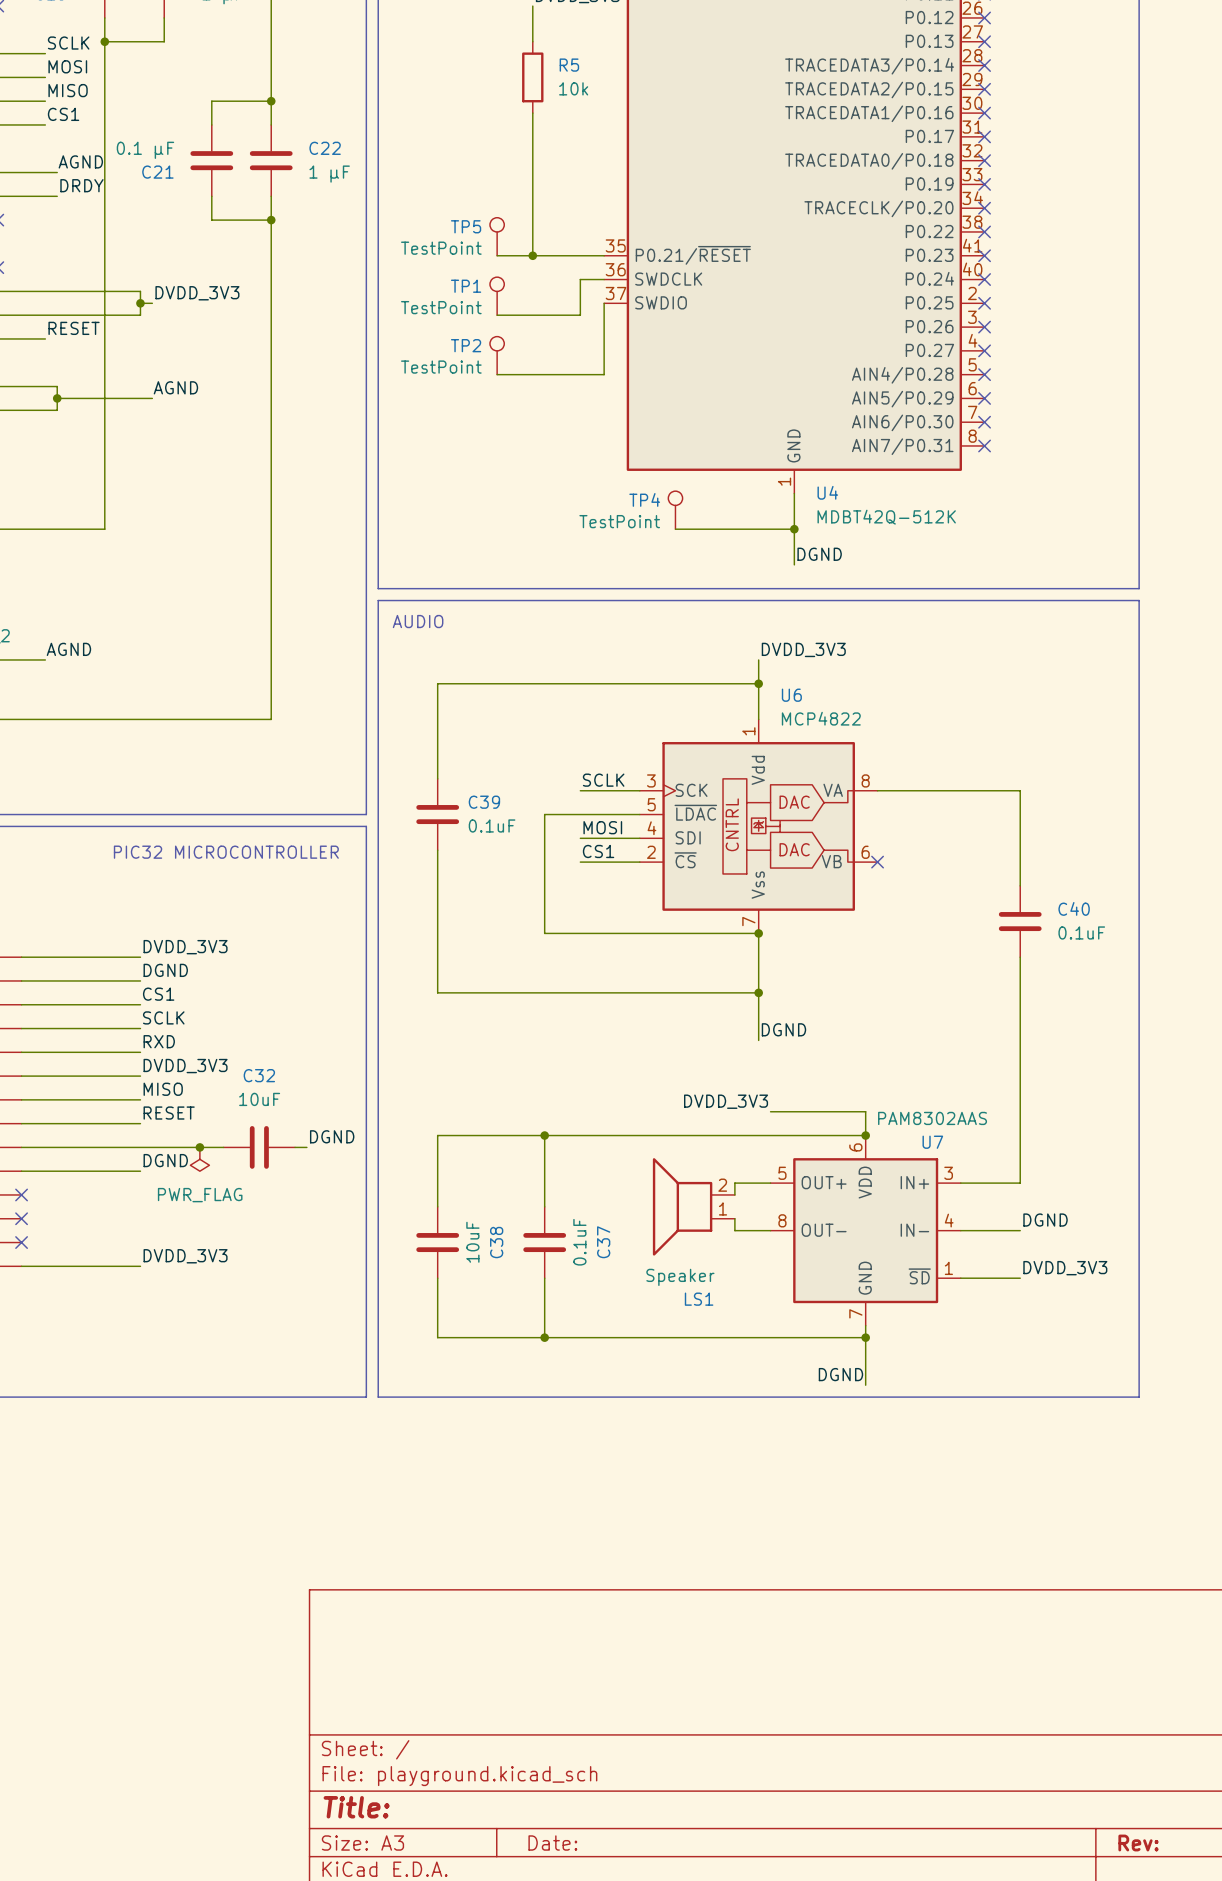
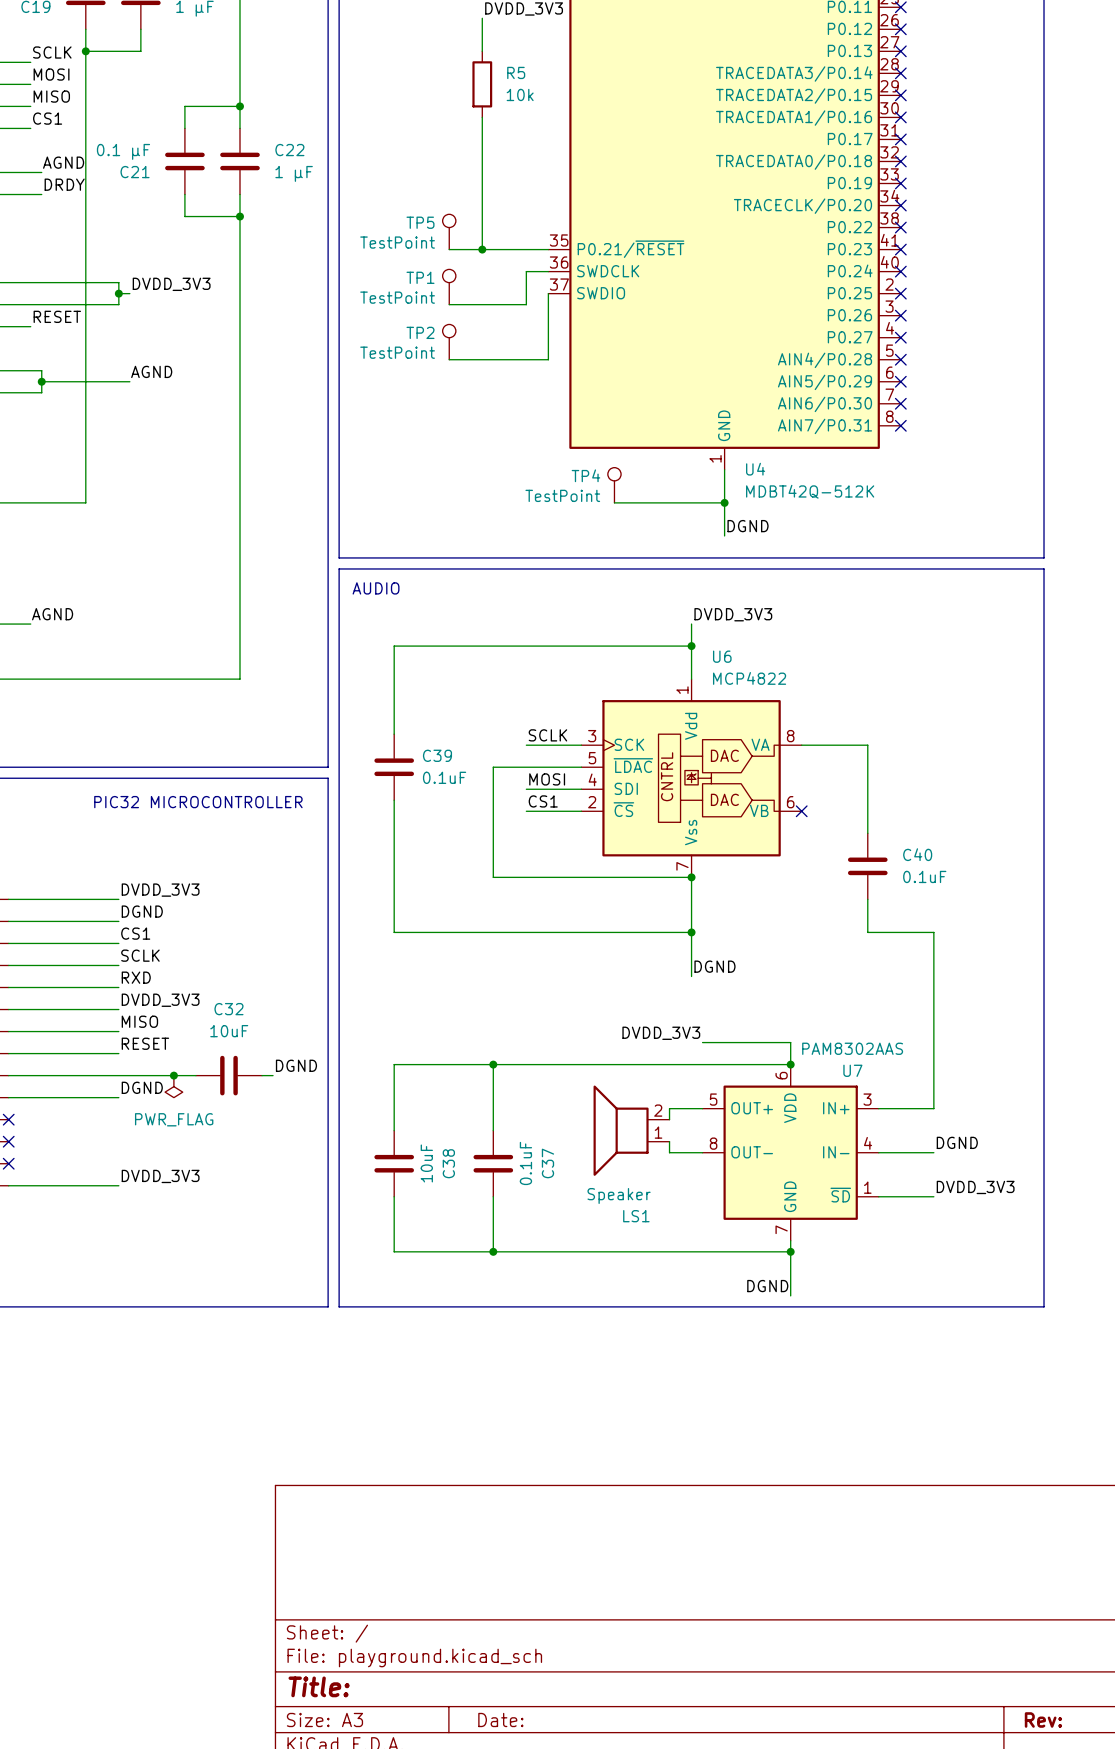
wire: (948, 790) (1020, 790) (1020, 885) -> (867, 745) (867, 833)
C40 position: (1020, 921) -> (867, 866)
wire: (1020, 957) (1020, 992) -> (867, 899) (867, 932) (933, 932)

